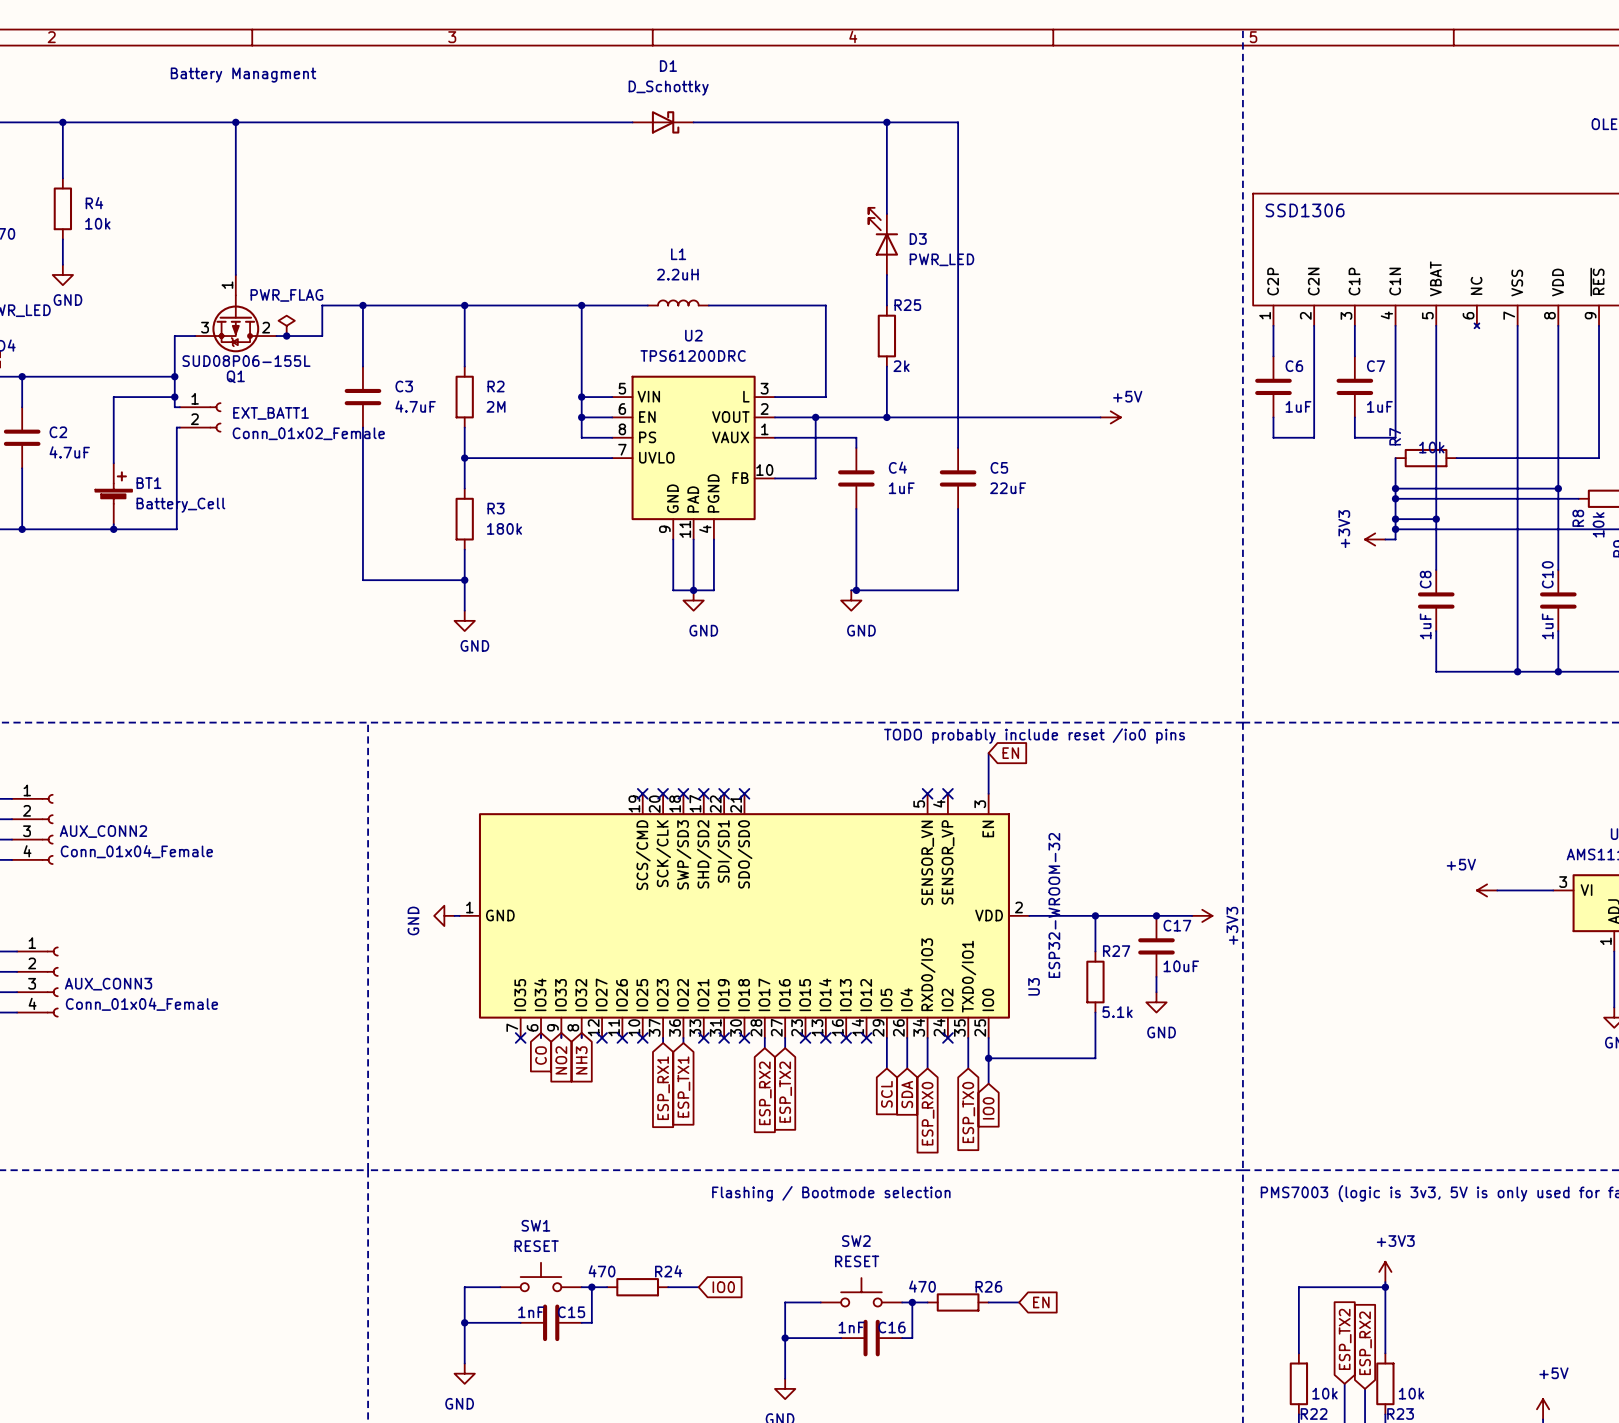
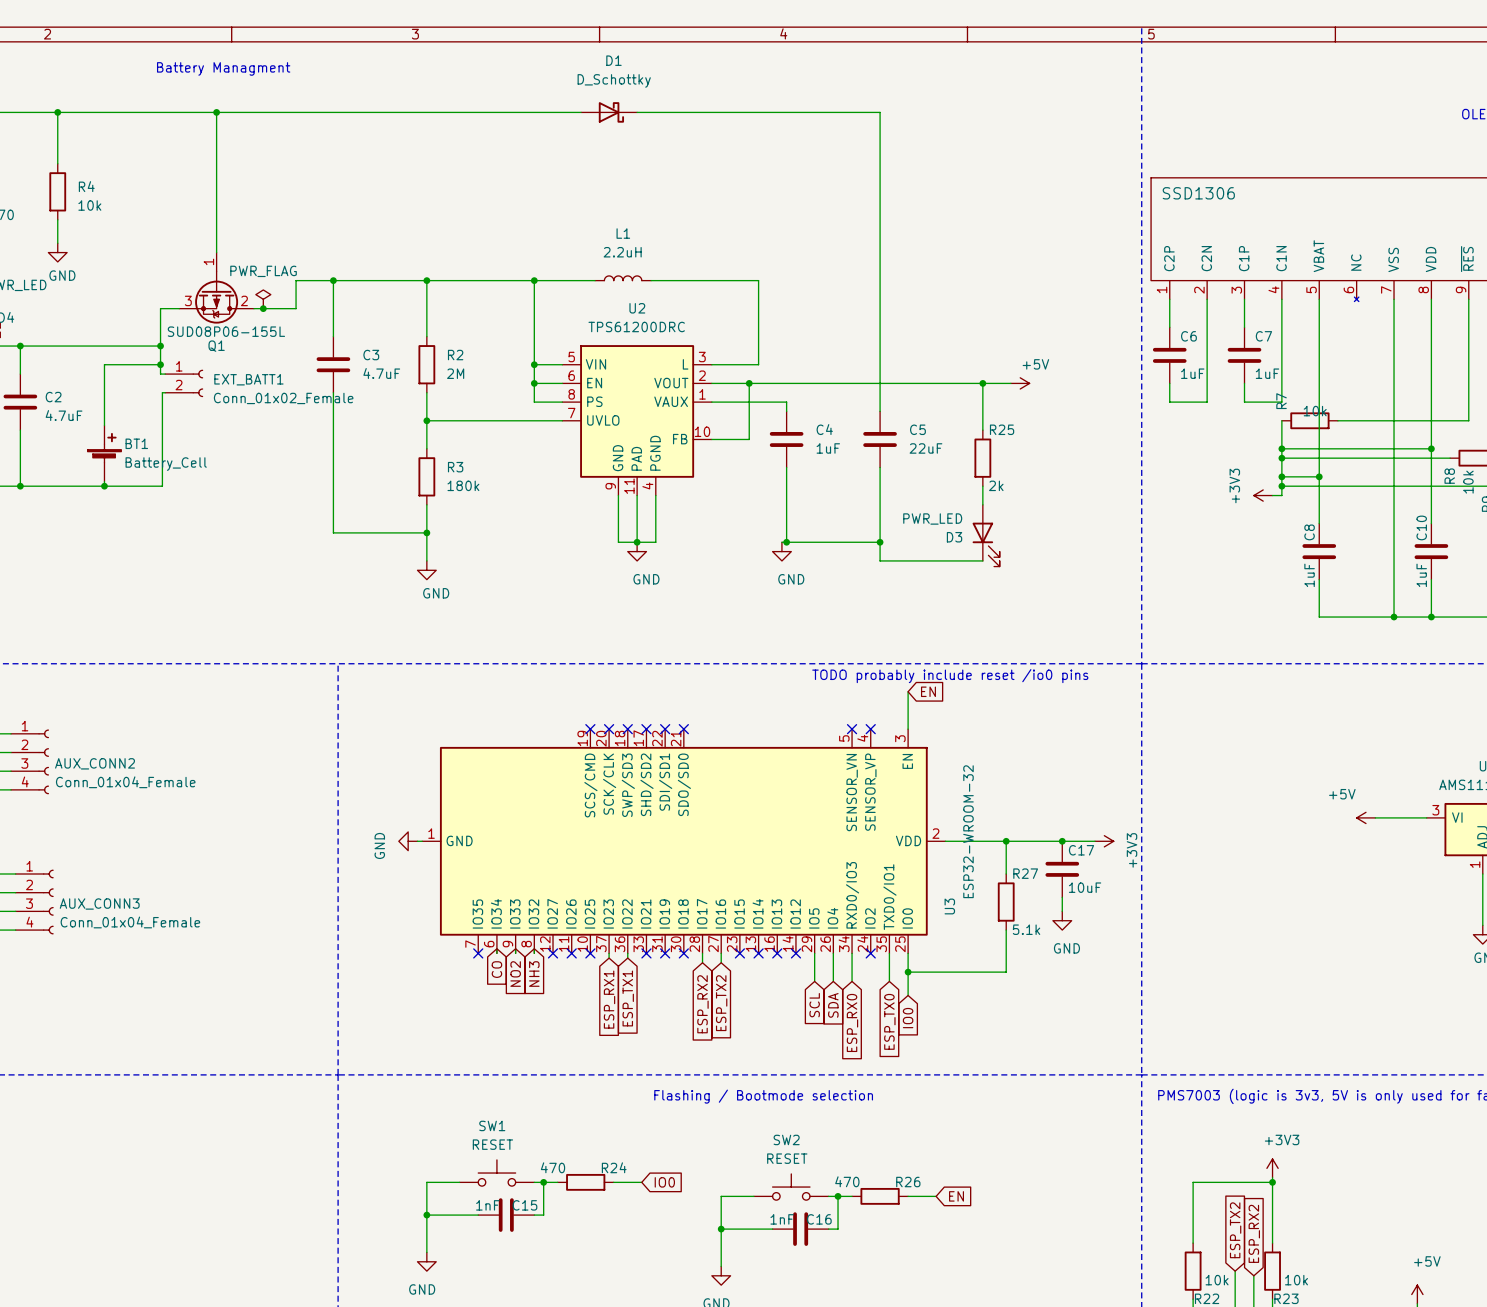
wire: (886, 122) (886, 213) -> none
junction: (886, 122) -> none
D3 rotation: 0° (883, 231) -> 180° (986, 544)
D3 position: (883, 241) -> (986, 535)
wire: (886, 274) (886, 305) -> none
R25 position: (886, 336) -> (982, 458)
wire: (886, 366) (886, 417) -> (982, 383) (982, 430)
junction: (886, 417) -> none
junction: none -> (982, 383)
wire: none -> (982, 486) (982, 504)
wire: none -> (880, 542) (880, 560) (982, 560)
junction: none -> (880, 542)

